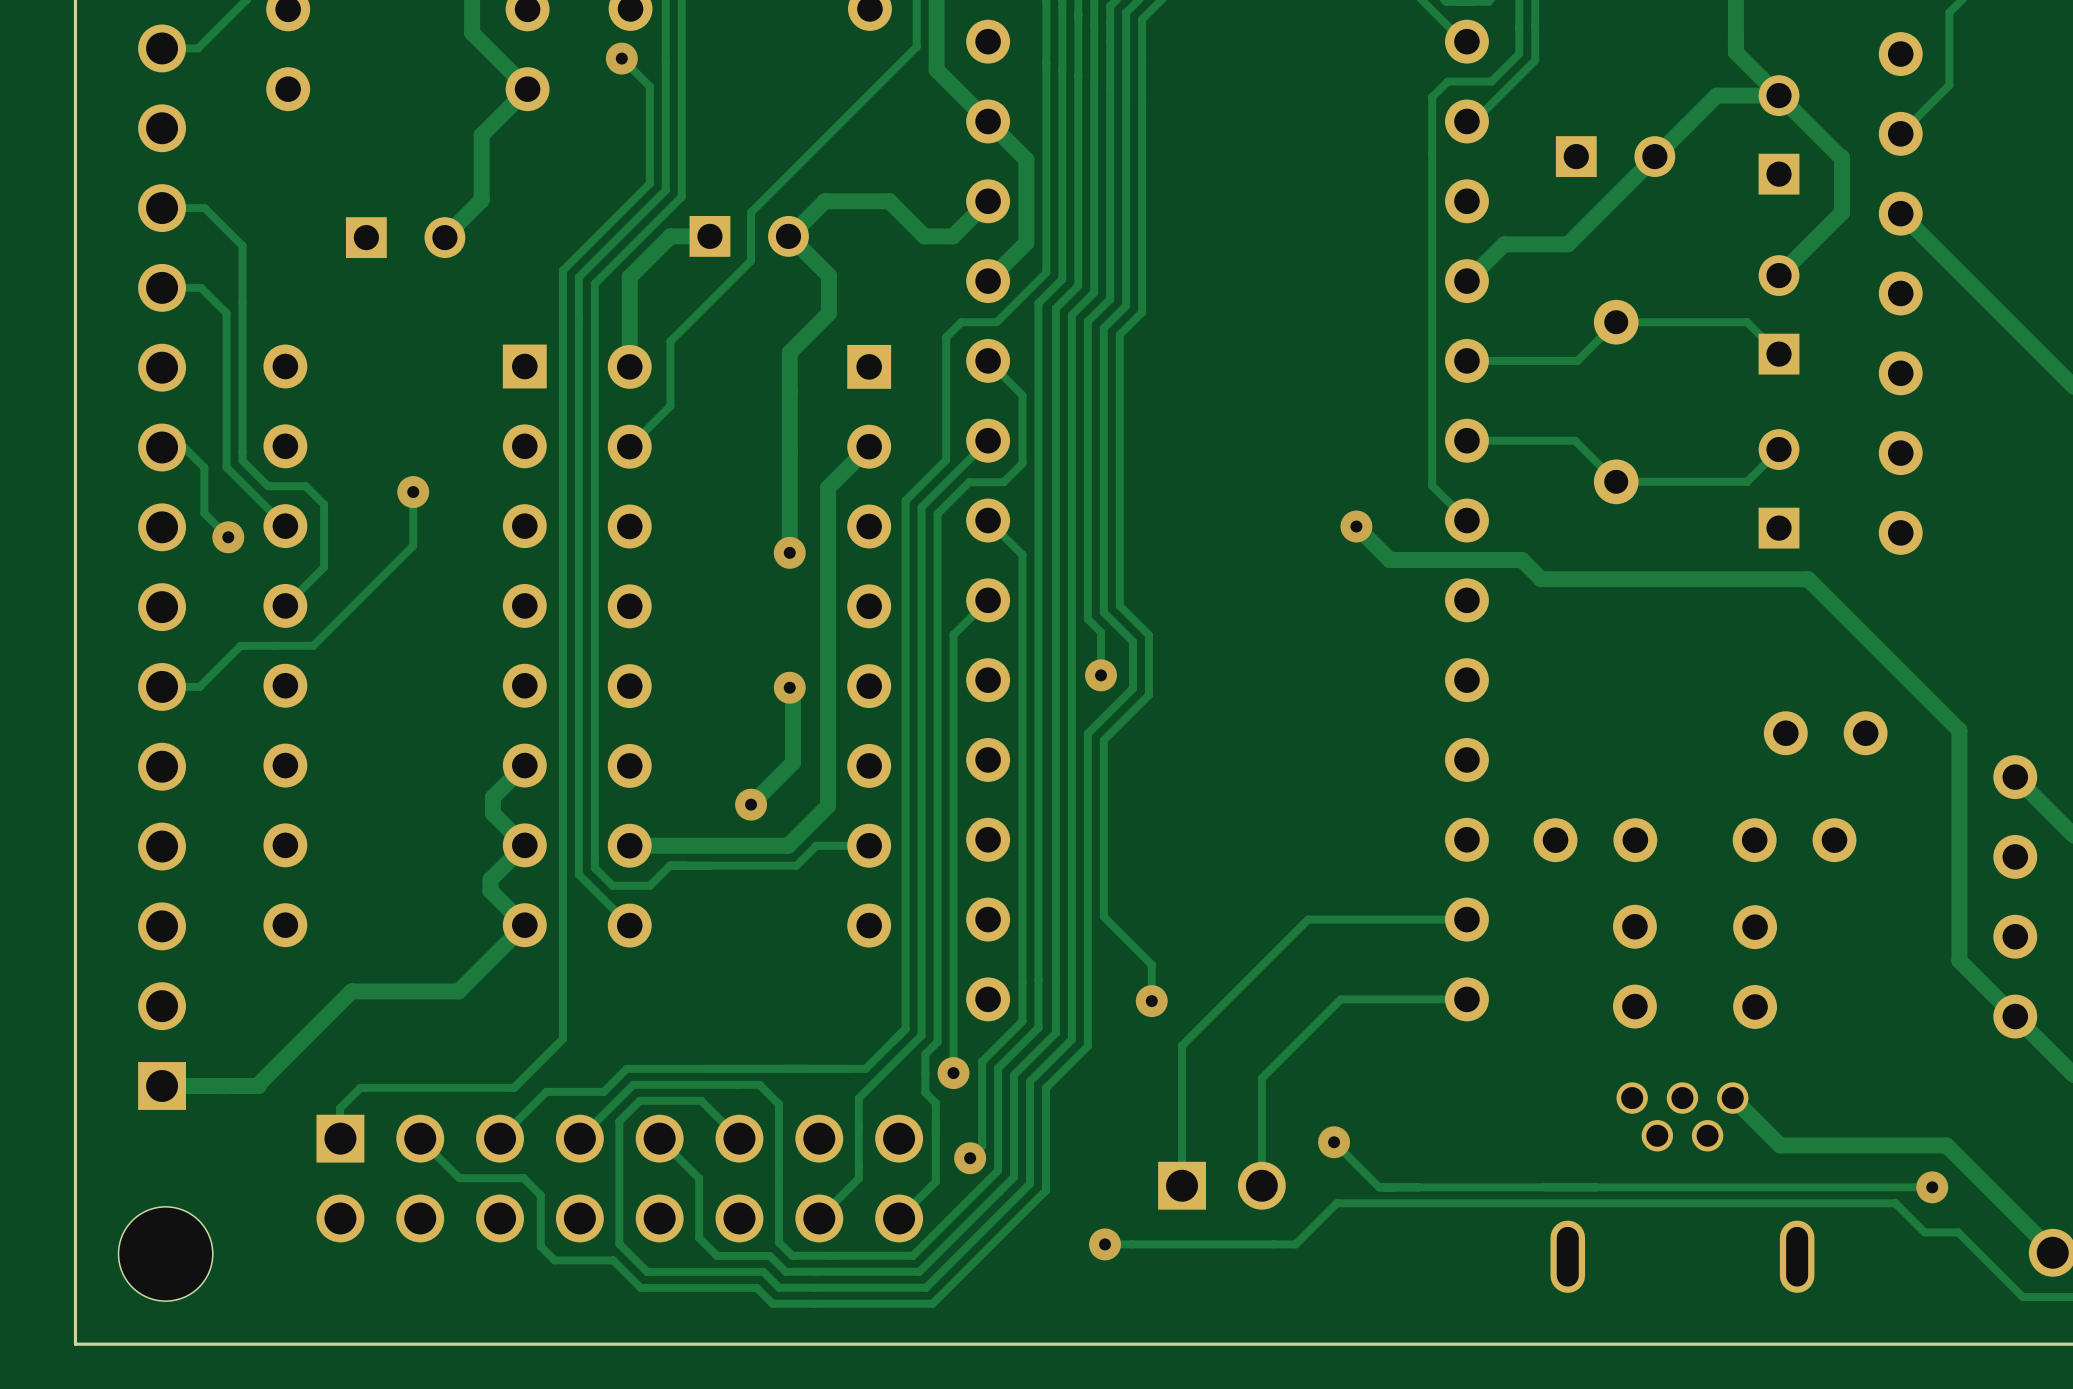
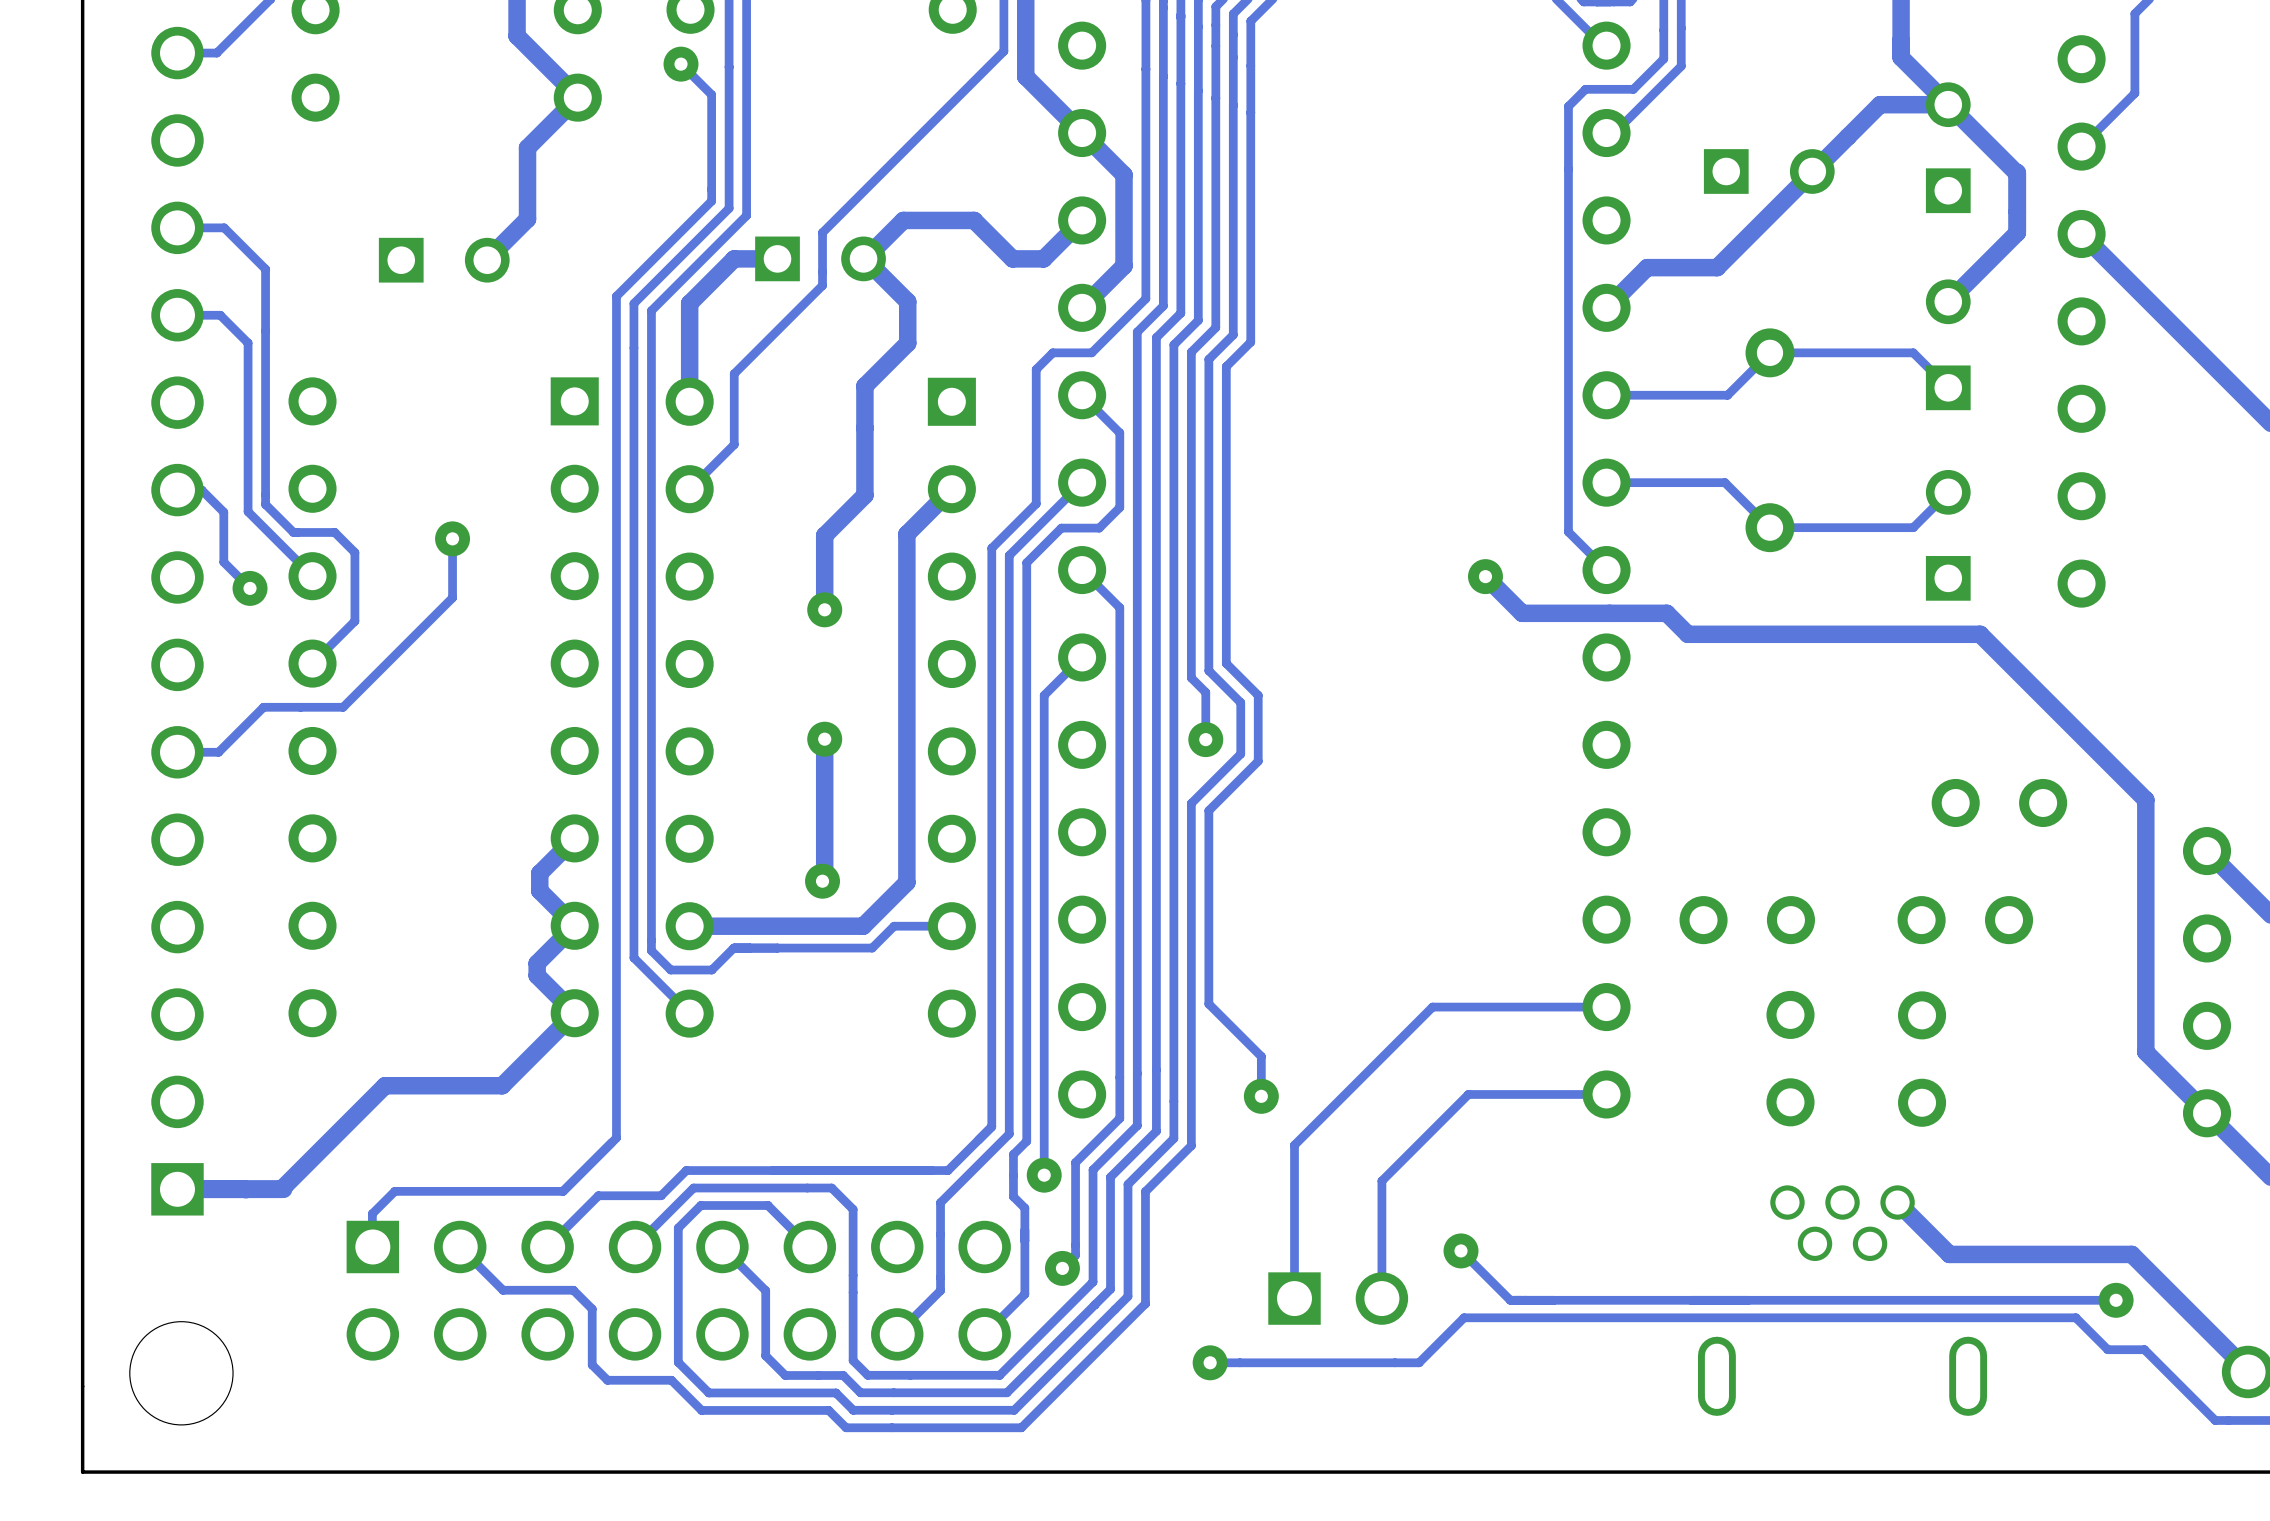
track: (789, 452) (789, 552) -> (864, 495) (824, 535) (824, 609)
via position: (789, 552) -> (824, 609)
track: none -> (824, 739) (824, 876)
track: (789, 687) (792, 690) (792, 762) (751, 804) -> none
via position: (789, 687) -> (824, 739)

